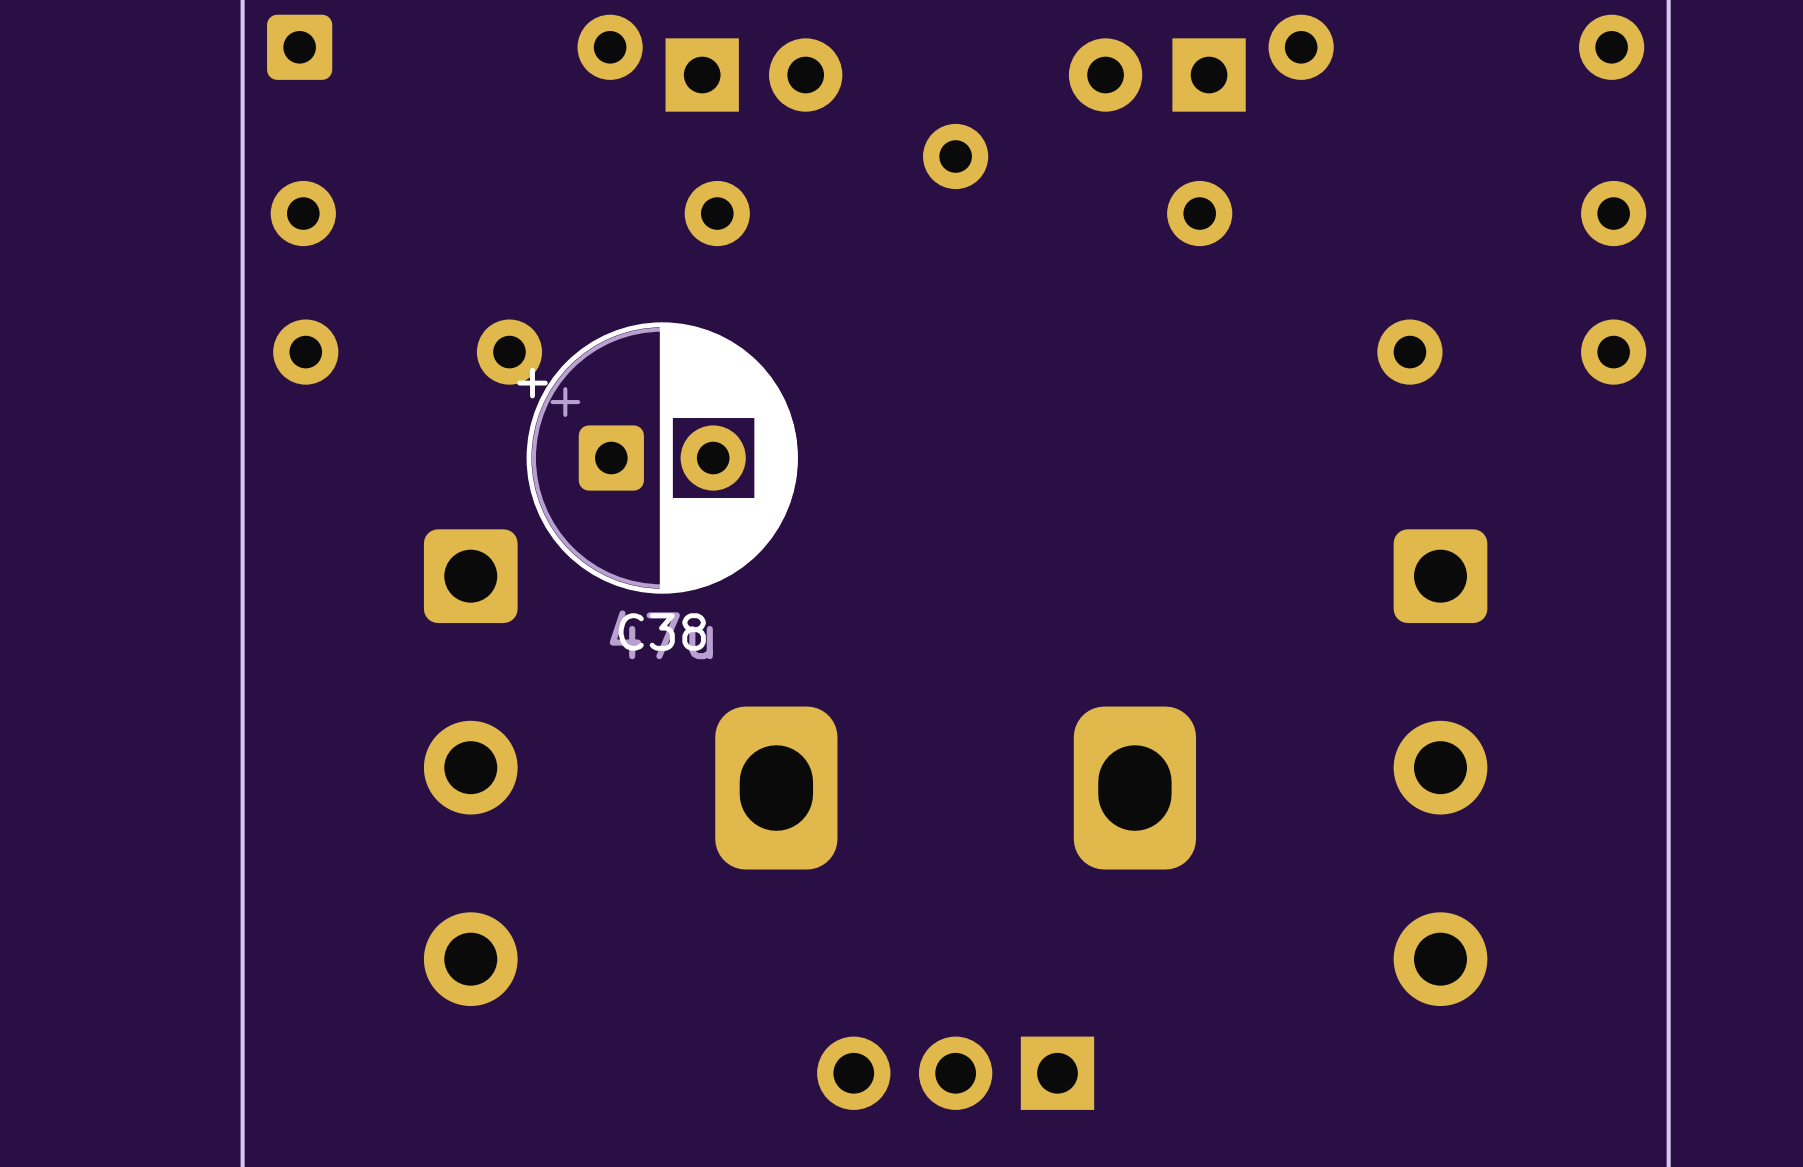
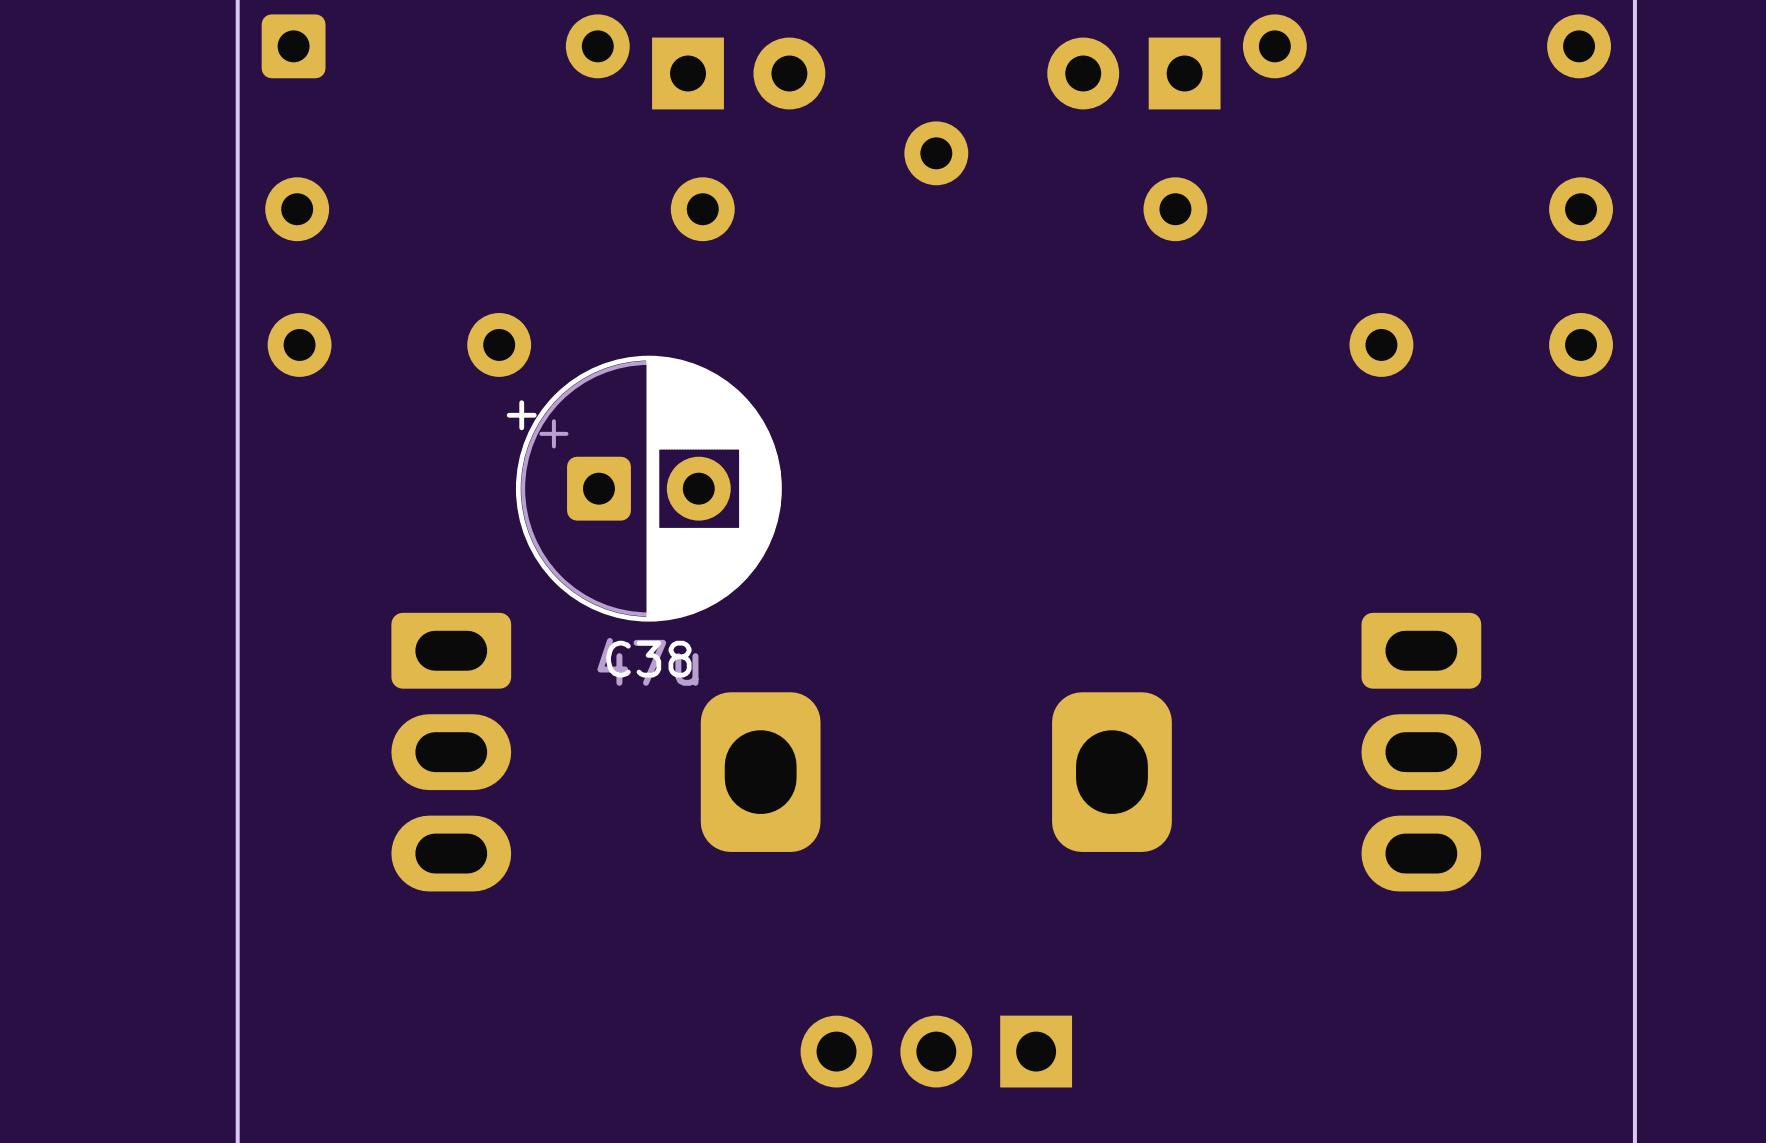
C38 position: (657, 458) -> (644, 488)
part footprint: [423, 529, 518, 1007] -> [391, 612, 512, 892]
part footprint: [1393, 529, 1488, 1007] -> [1361, 612, 1482, 892]

